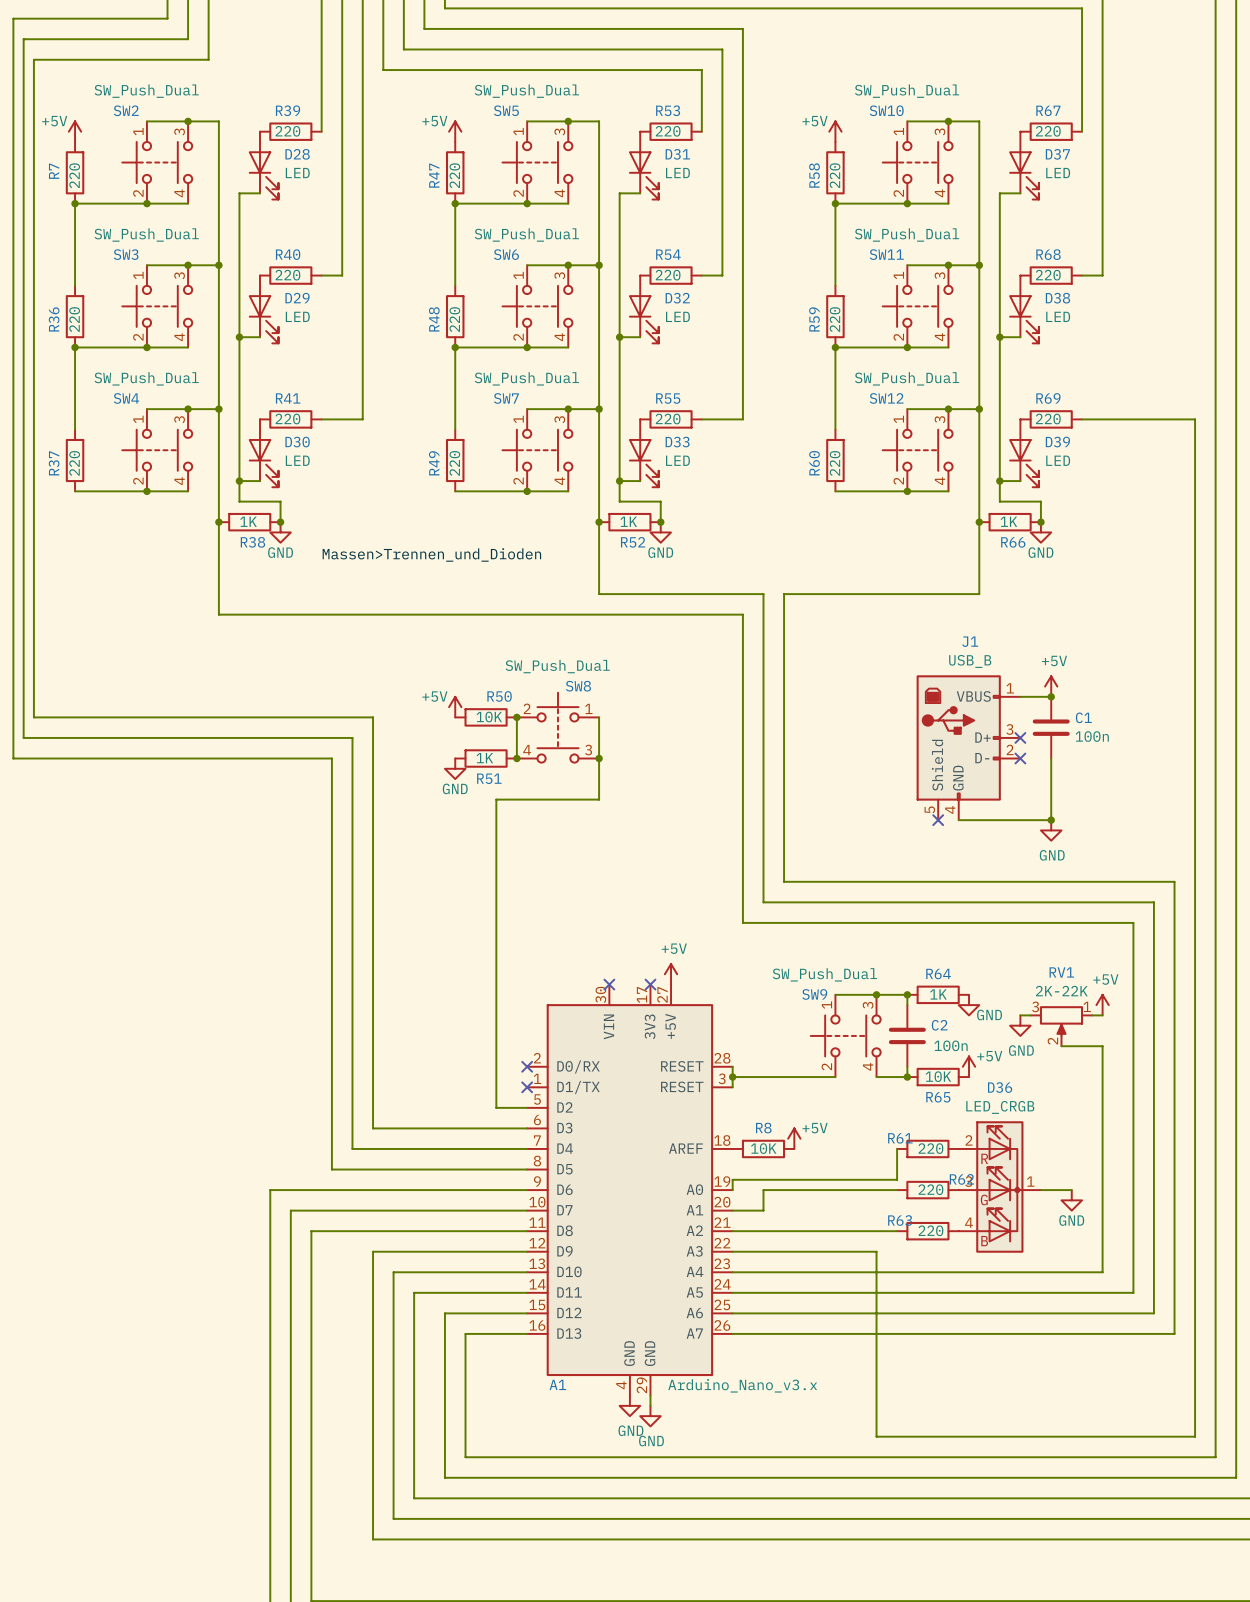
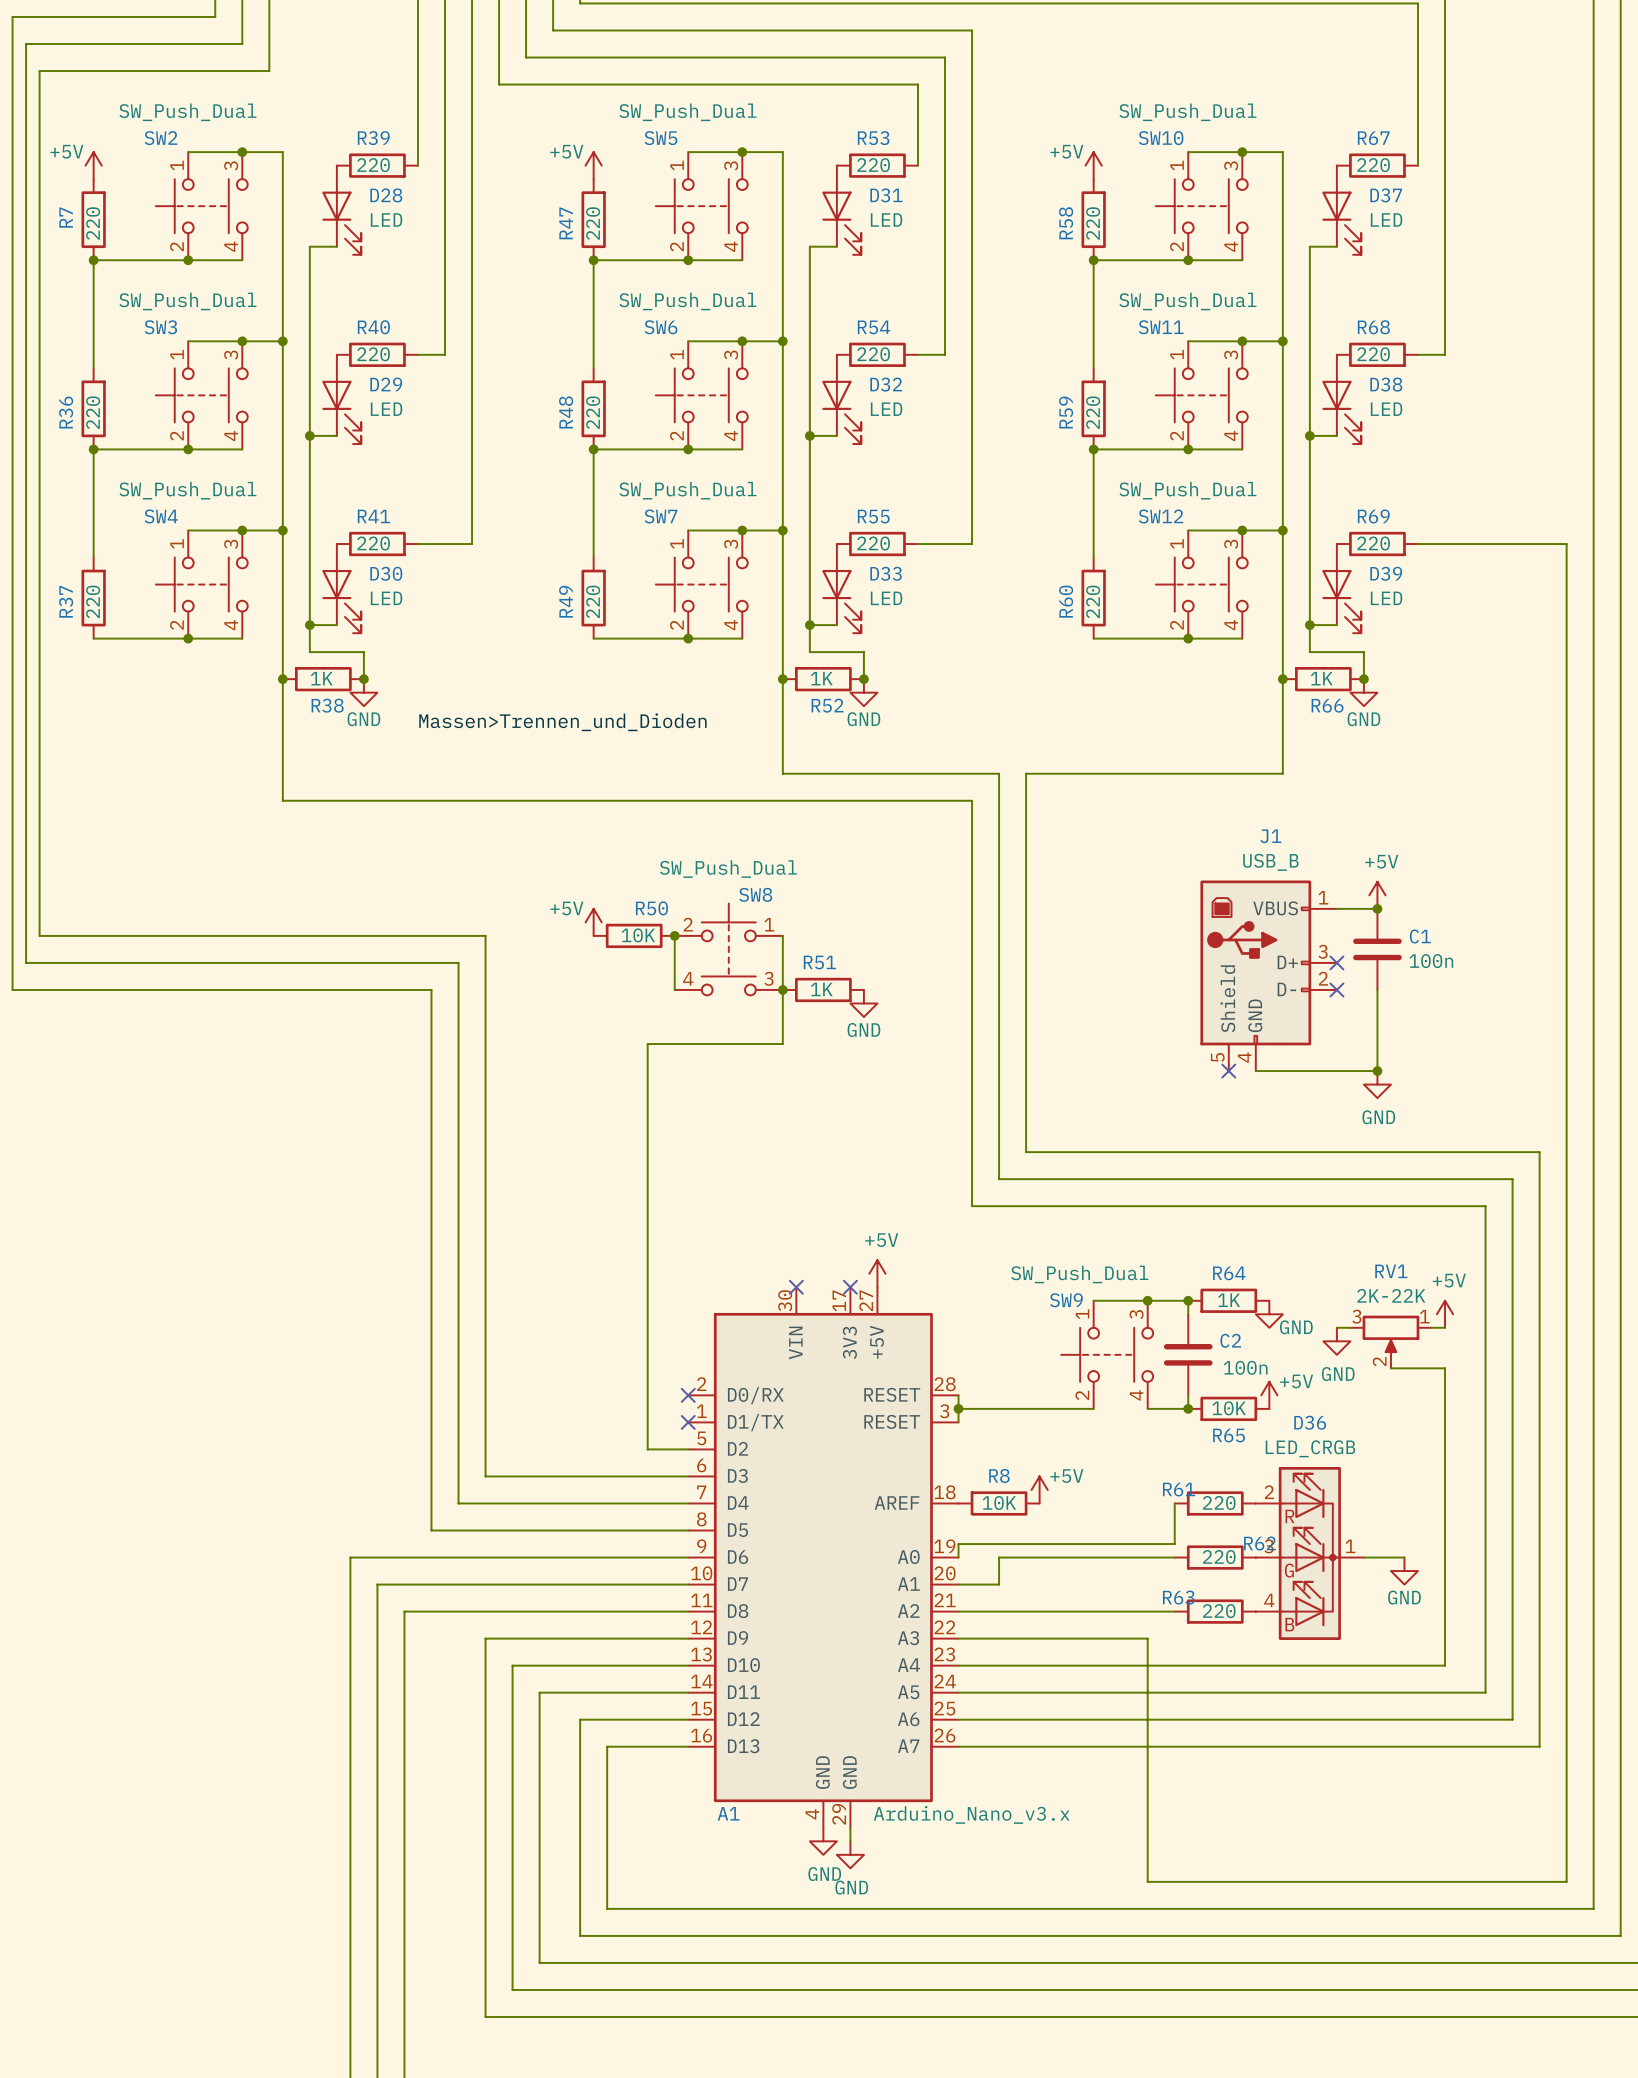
R51 position: (486, 758) -> (823, 989)
junction: (516, 758) -> none
power symbol: GND (455, 768) -> none
power symbol: none -> GND (863, 1003)
R51 name position: R51 (489, 778) -> R51 (819, 962)

